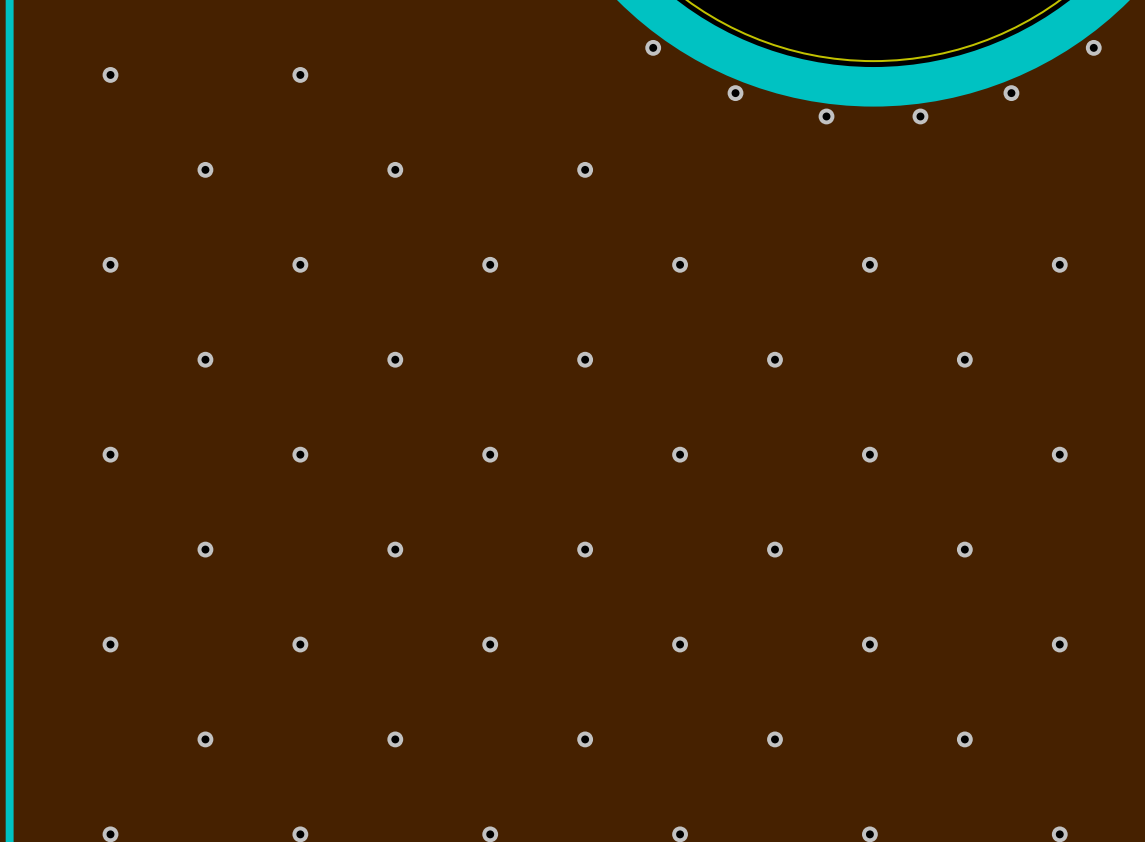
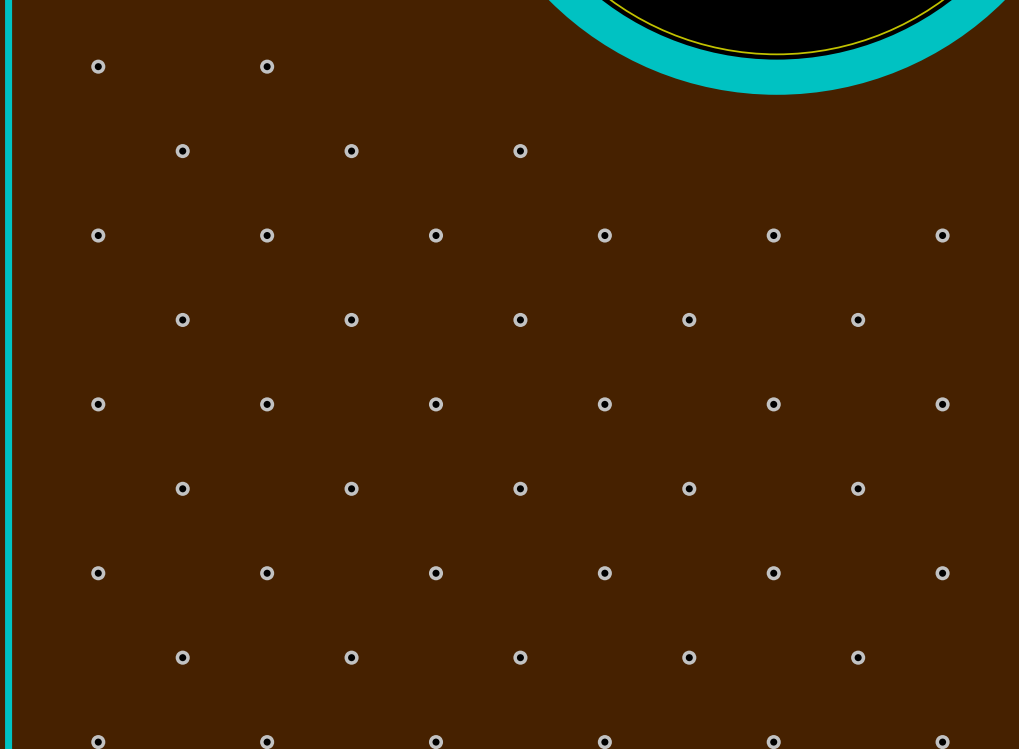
via: (653, 47) -> none
via: (1093, 47) -> none
via: (735, 93) -> none
via: (1011, 93) -> none
via: (826, 116) -> none
via: (920, 116) -> none

